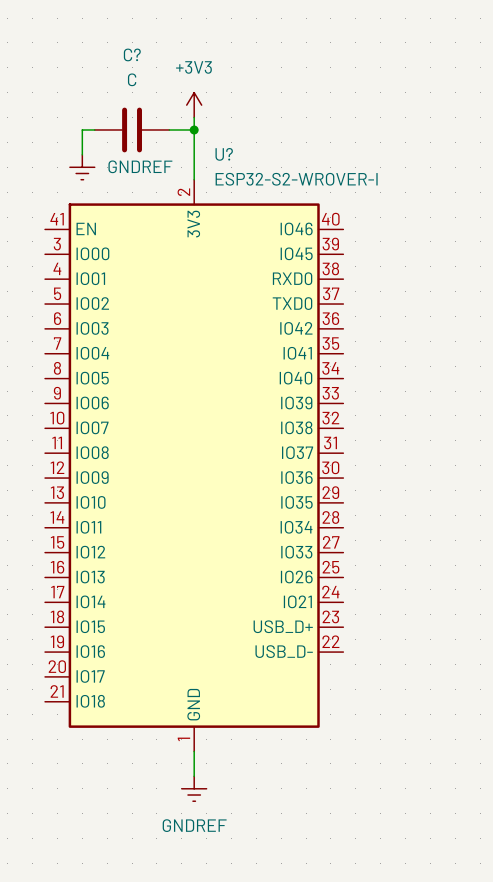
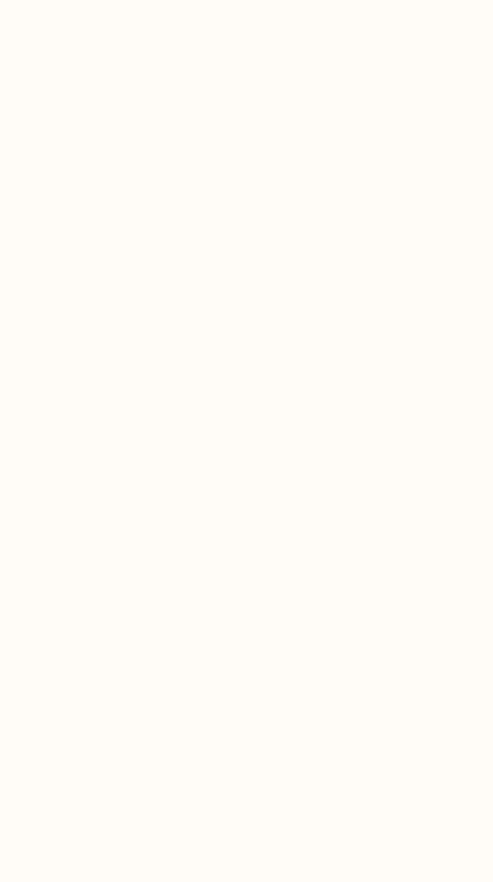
power symbol: +3V3 (194, 105) -> none
wire: (194, 117) (194, 179) -> none
wire: (94, 129) (82, 129) (82, 154) -> none
C?: C (132, 129) -> none
wire: (169, 129) (194, 129) -> none
junction: (194, 129) -> none
power symbol: GNDREF (82, 167) -> none
U?: ESP32-S2-WROVER-I (194, 465) -> none
wire: (194, 751) (194, 776) -> none
power symbol: GNDREF (194, 788) -> none

